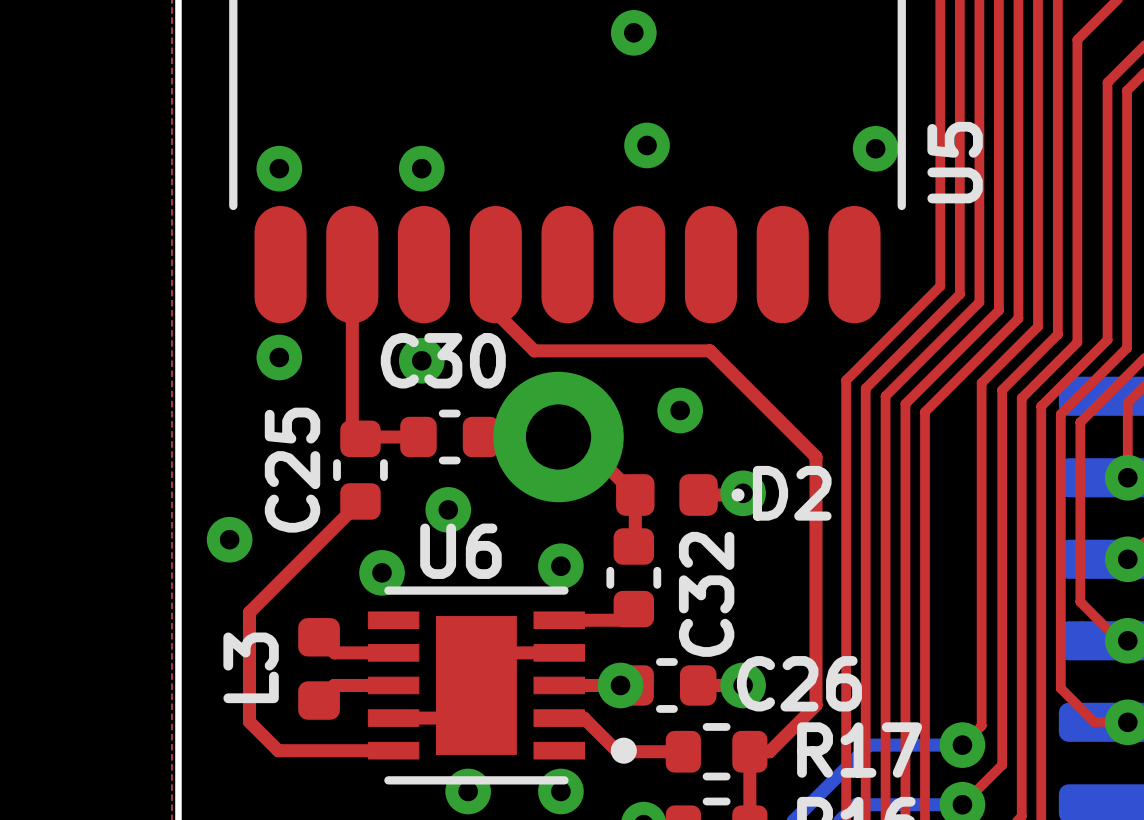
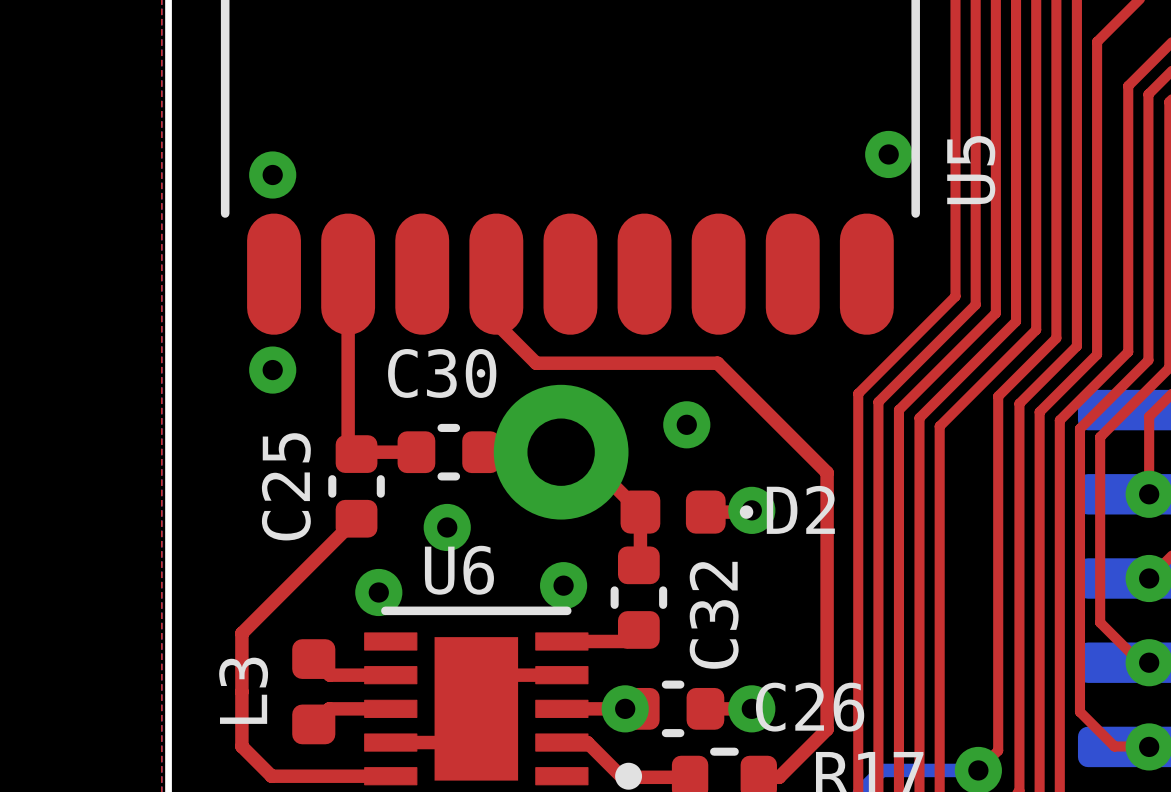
via: (633, 32) -> none
via: (647, 145) -> none
via: (421, 168) -> none
via: (421, 360) -> none
via: (229, 539) -> none

